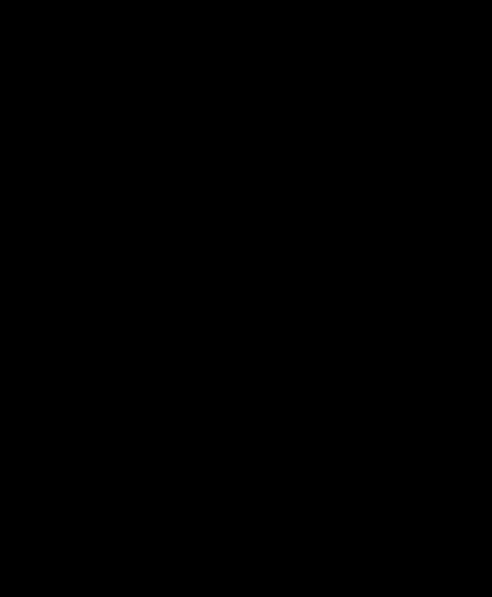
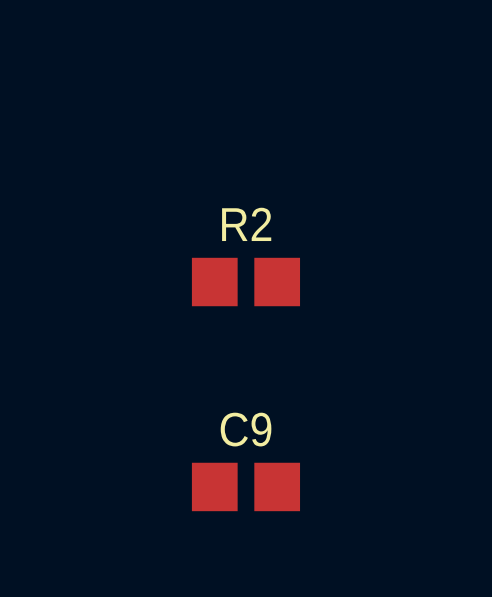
R2: none -> (245, 282)
C9: none -> (245, 486)

